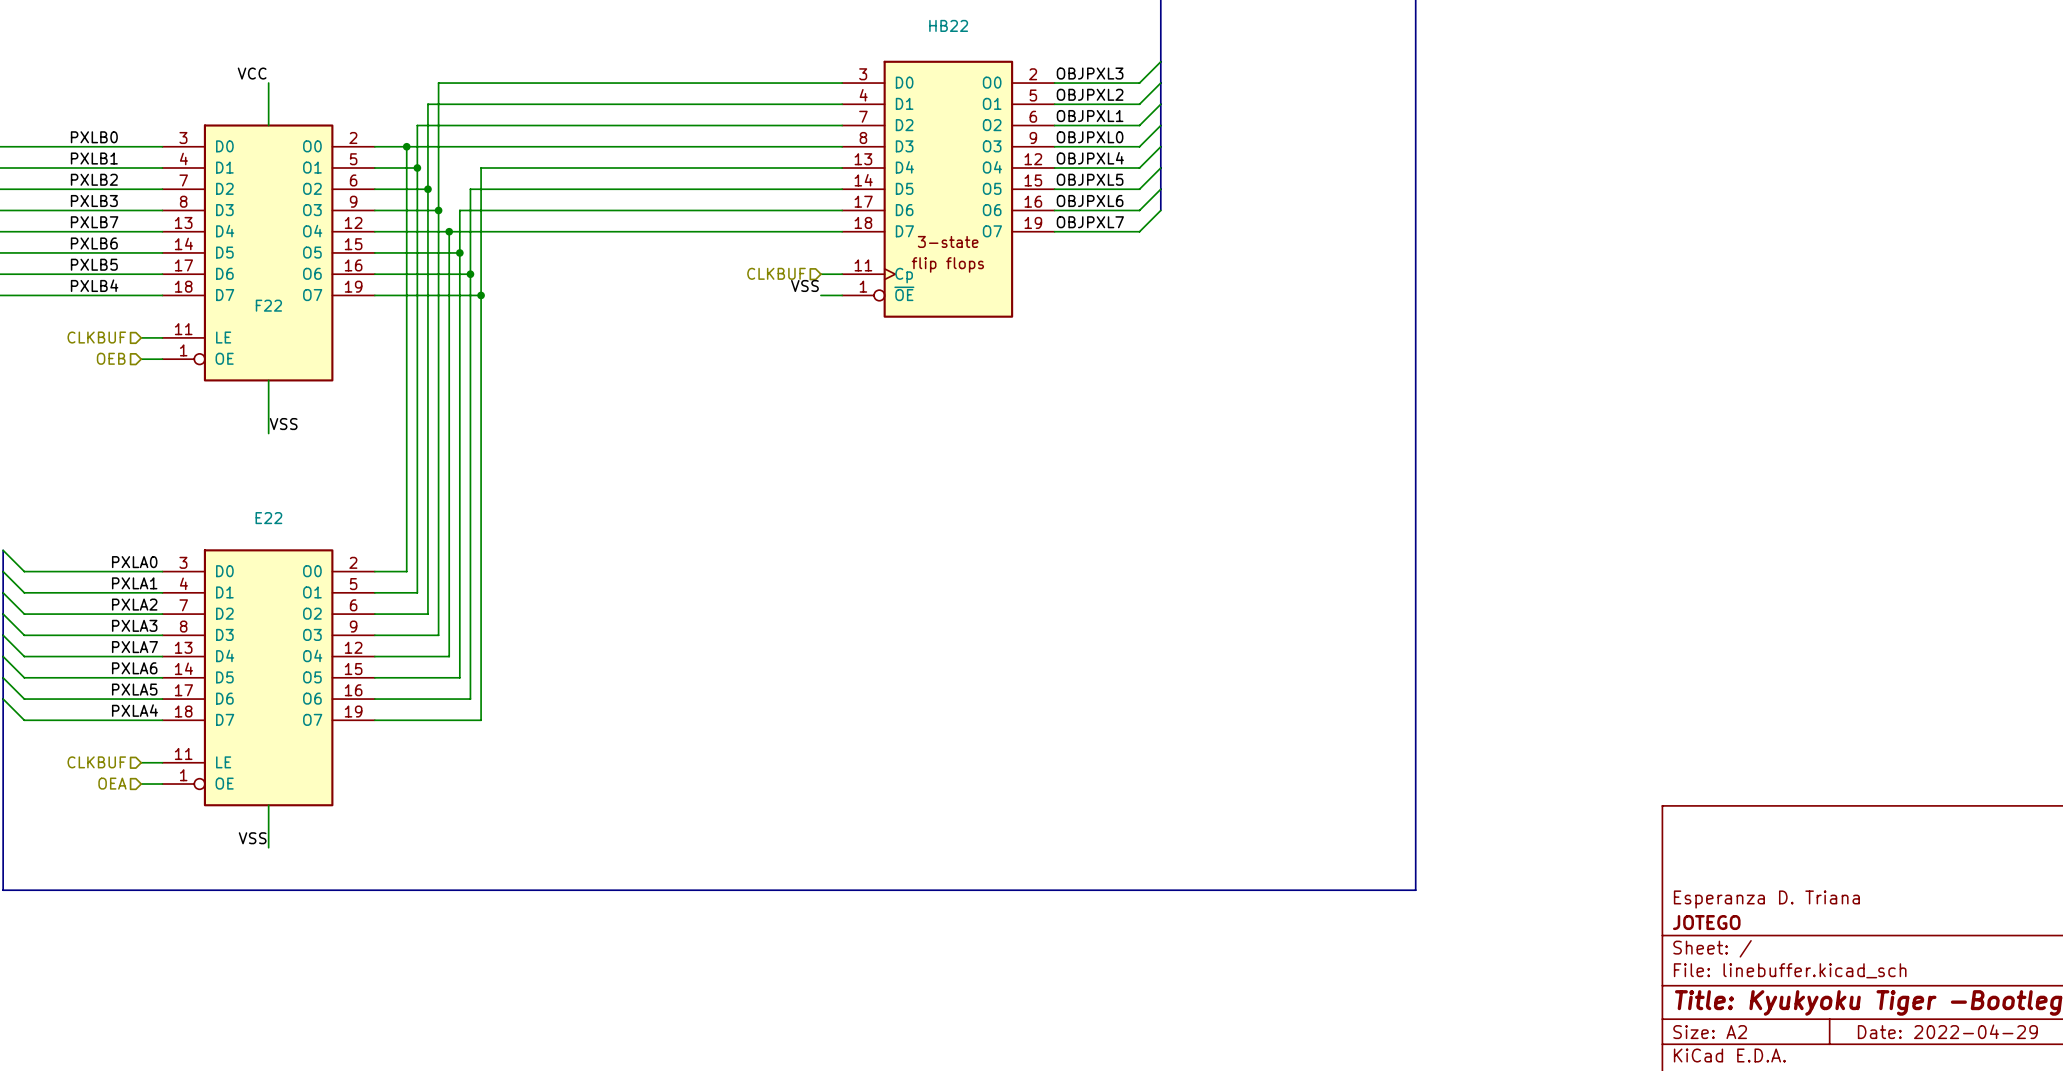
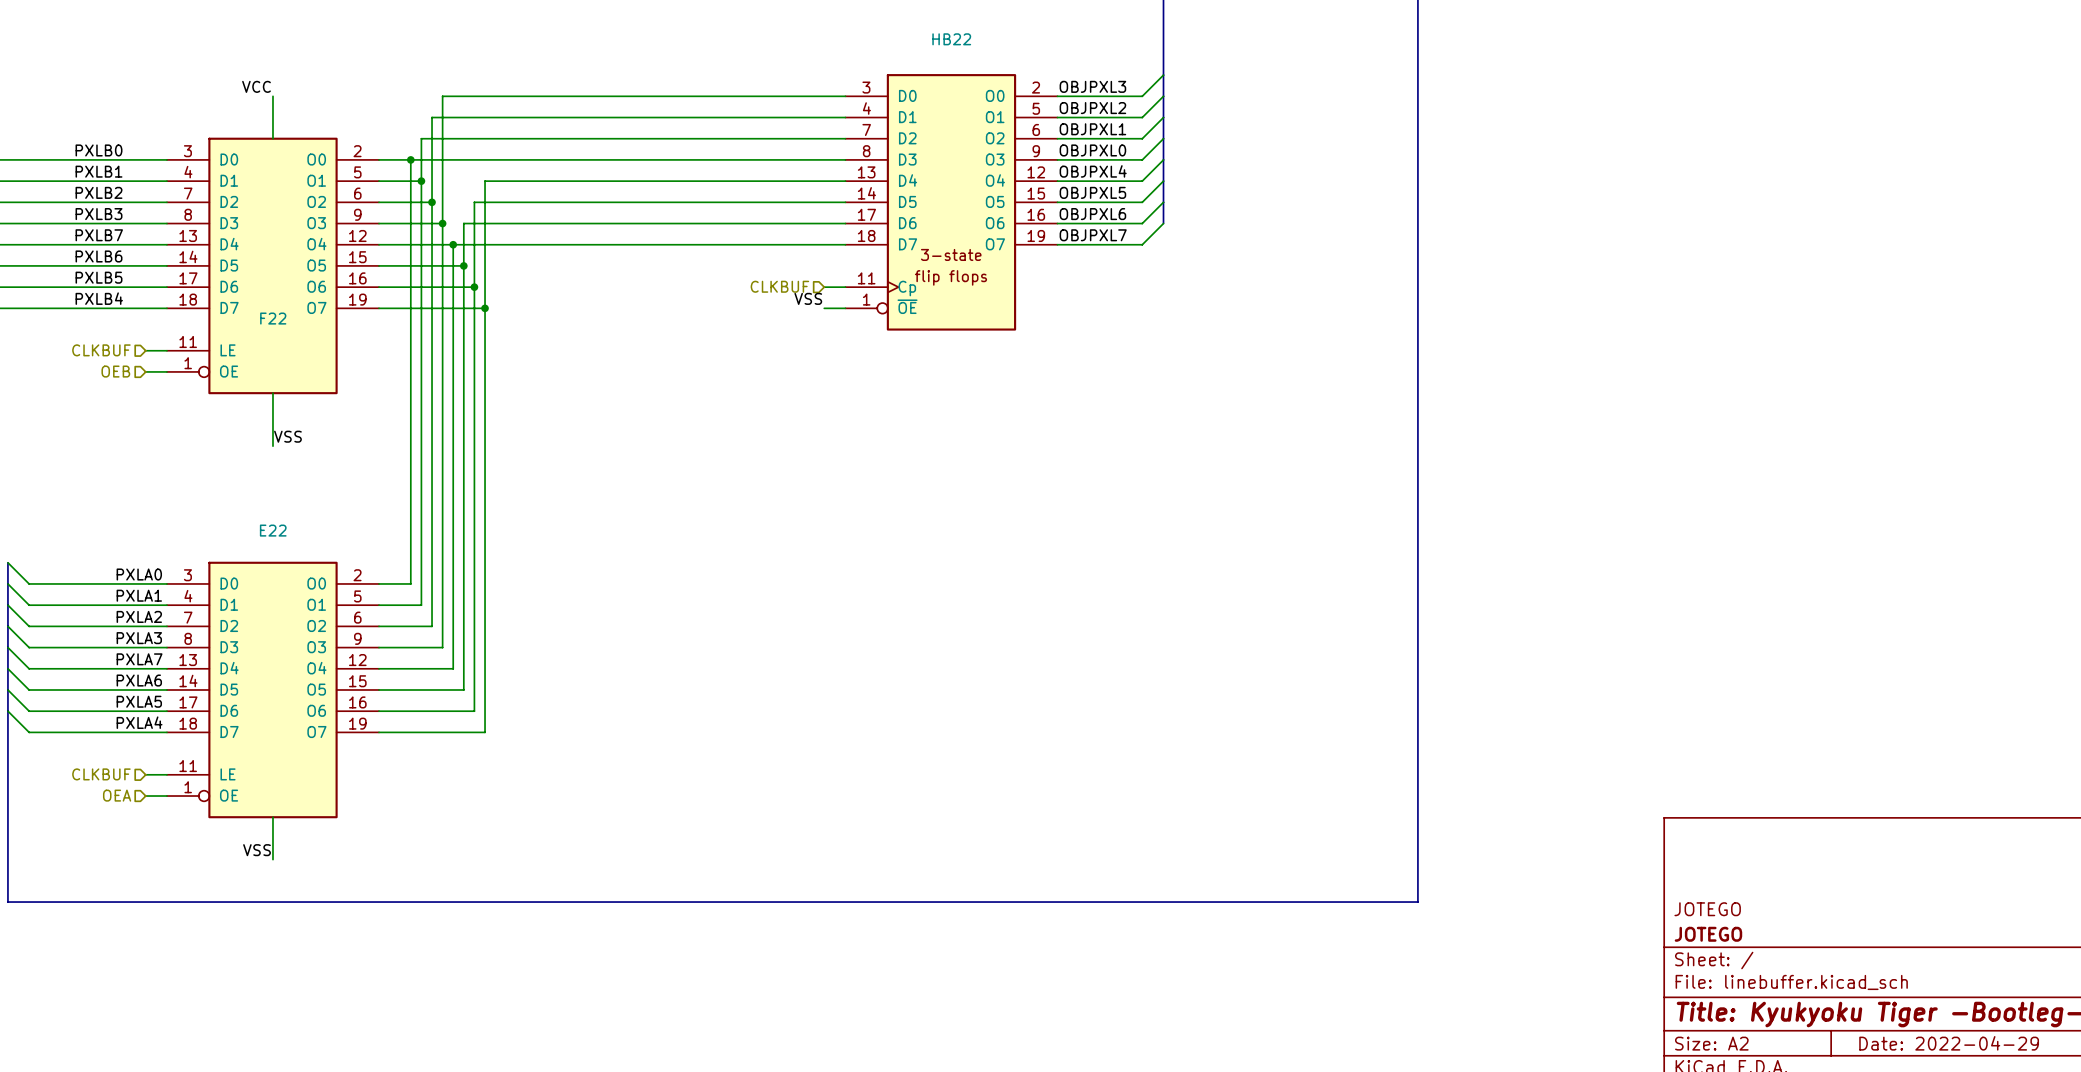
title block: Esperanza D. Triana (1766, 899) -> JOTEGO (1707, 909)

